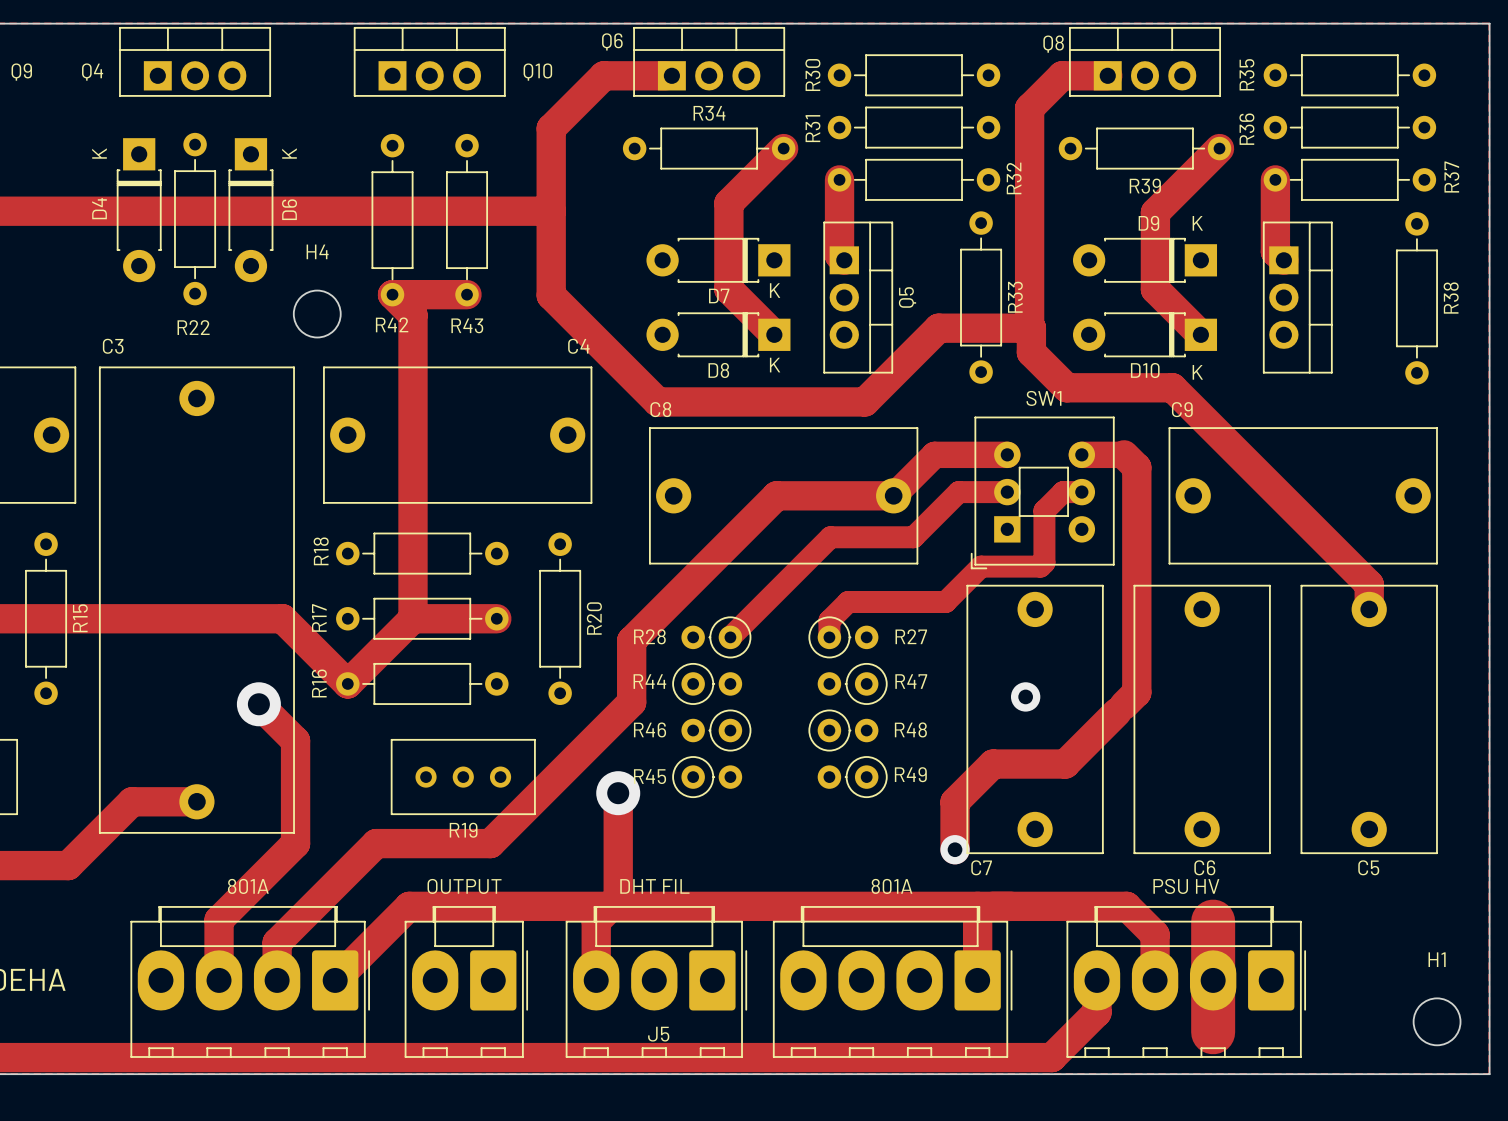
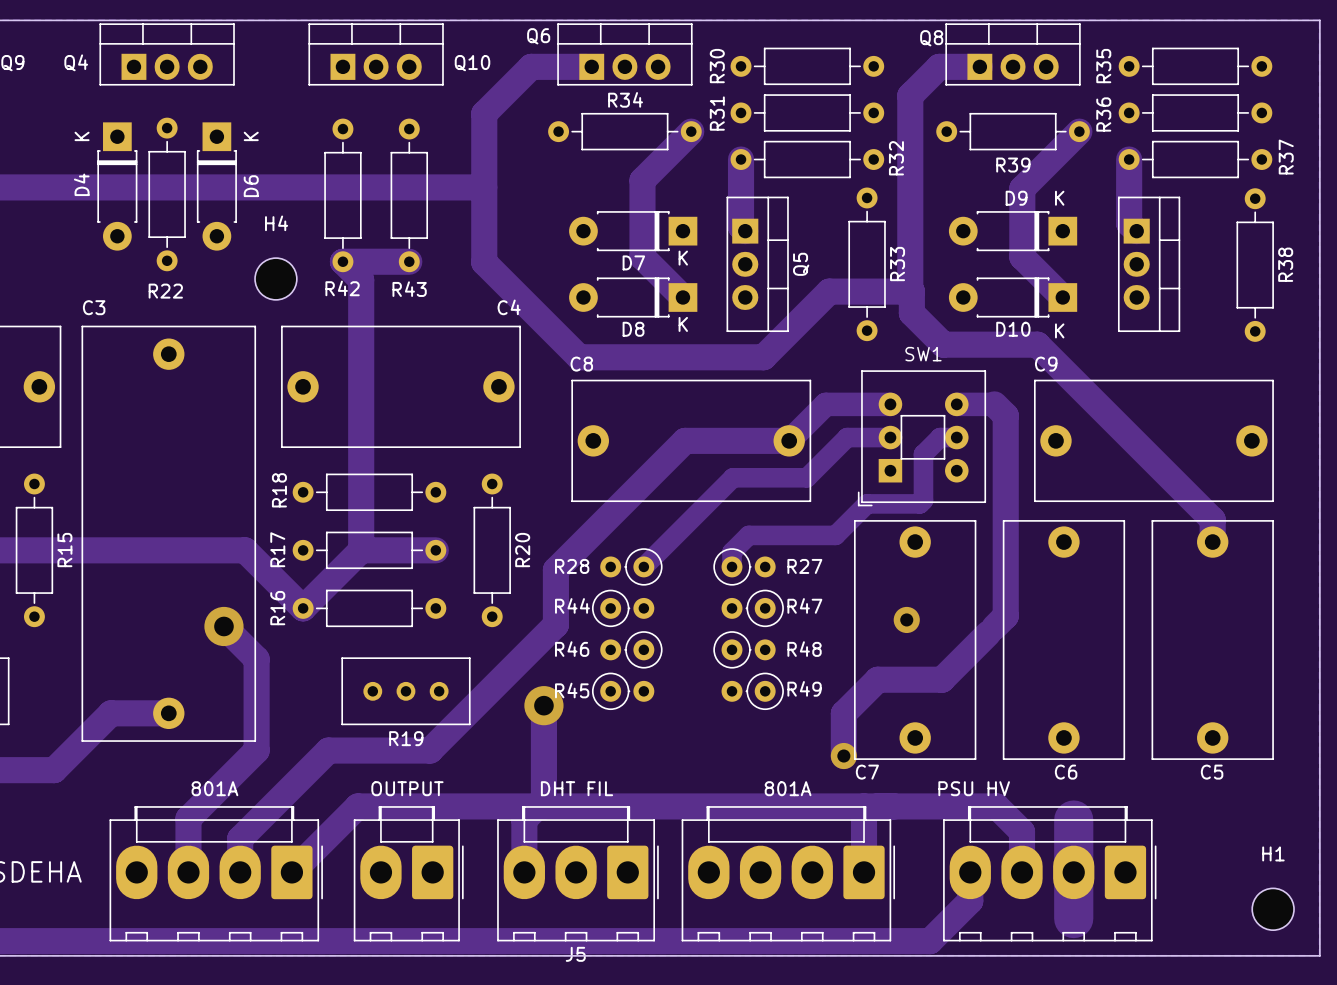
part value position: PSU HV (1186, 886) -> PSU HV (974, 788)
J5 name position: J5 (658, 1034) -> J5 (575, 954)

